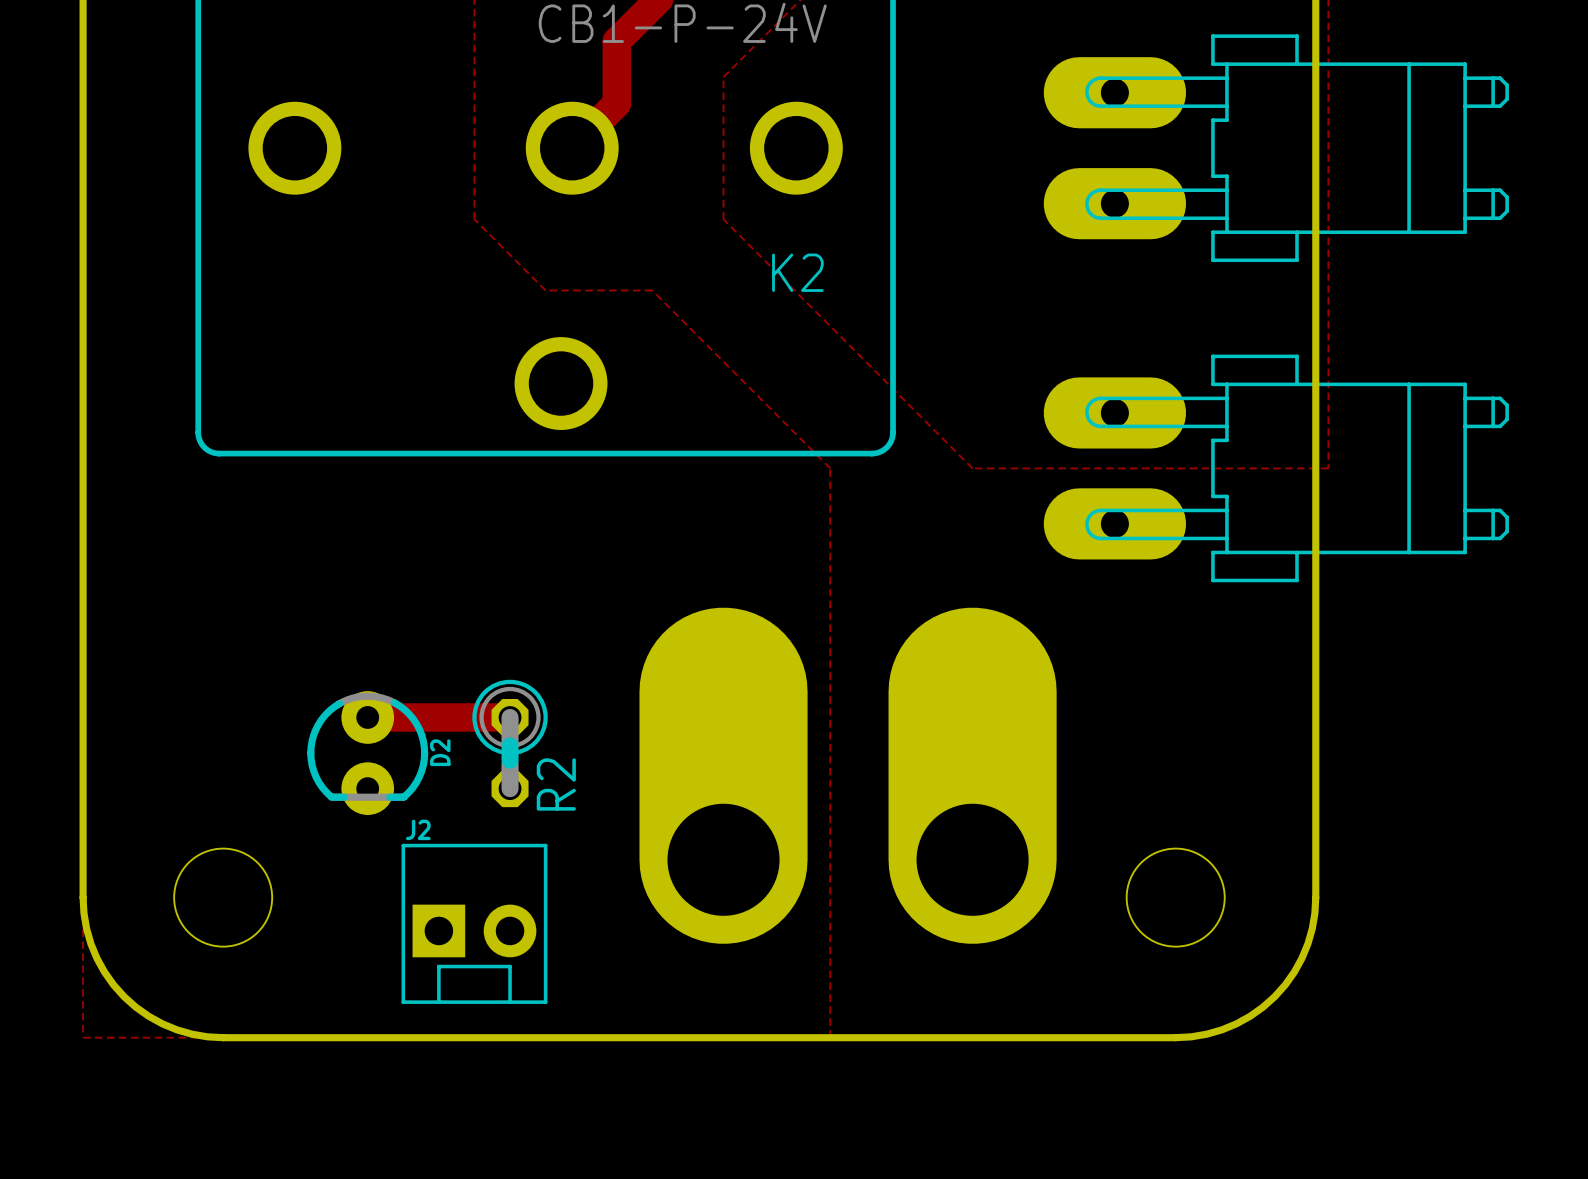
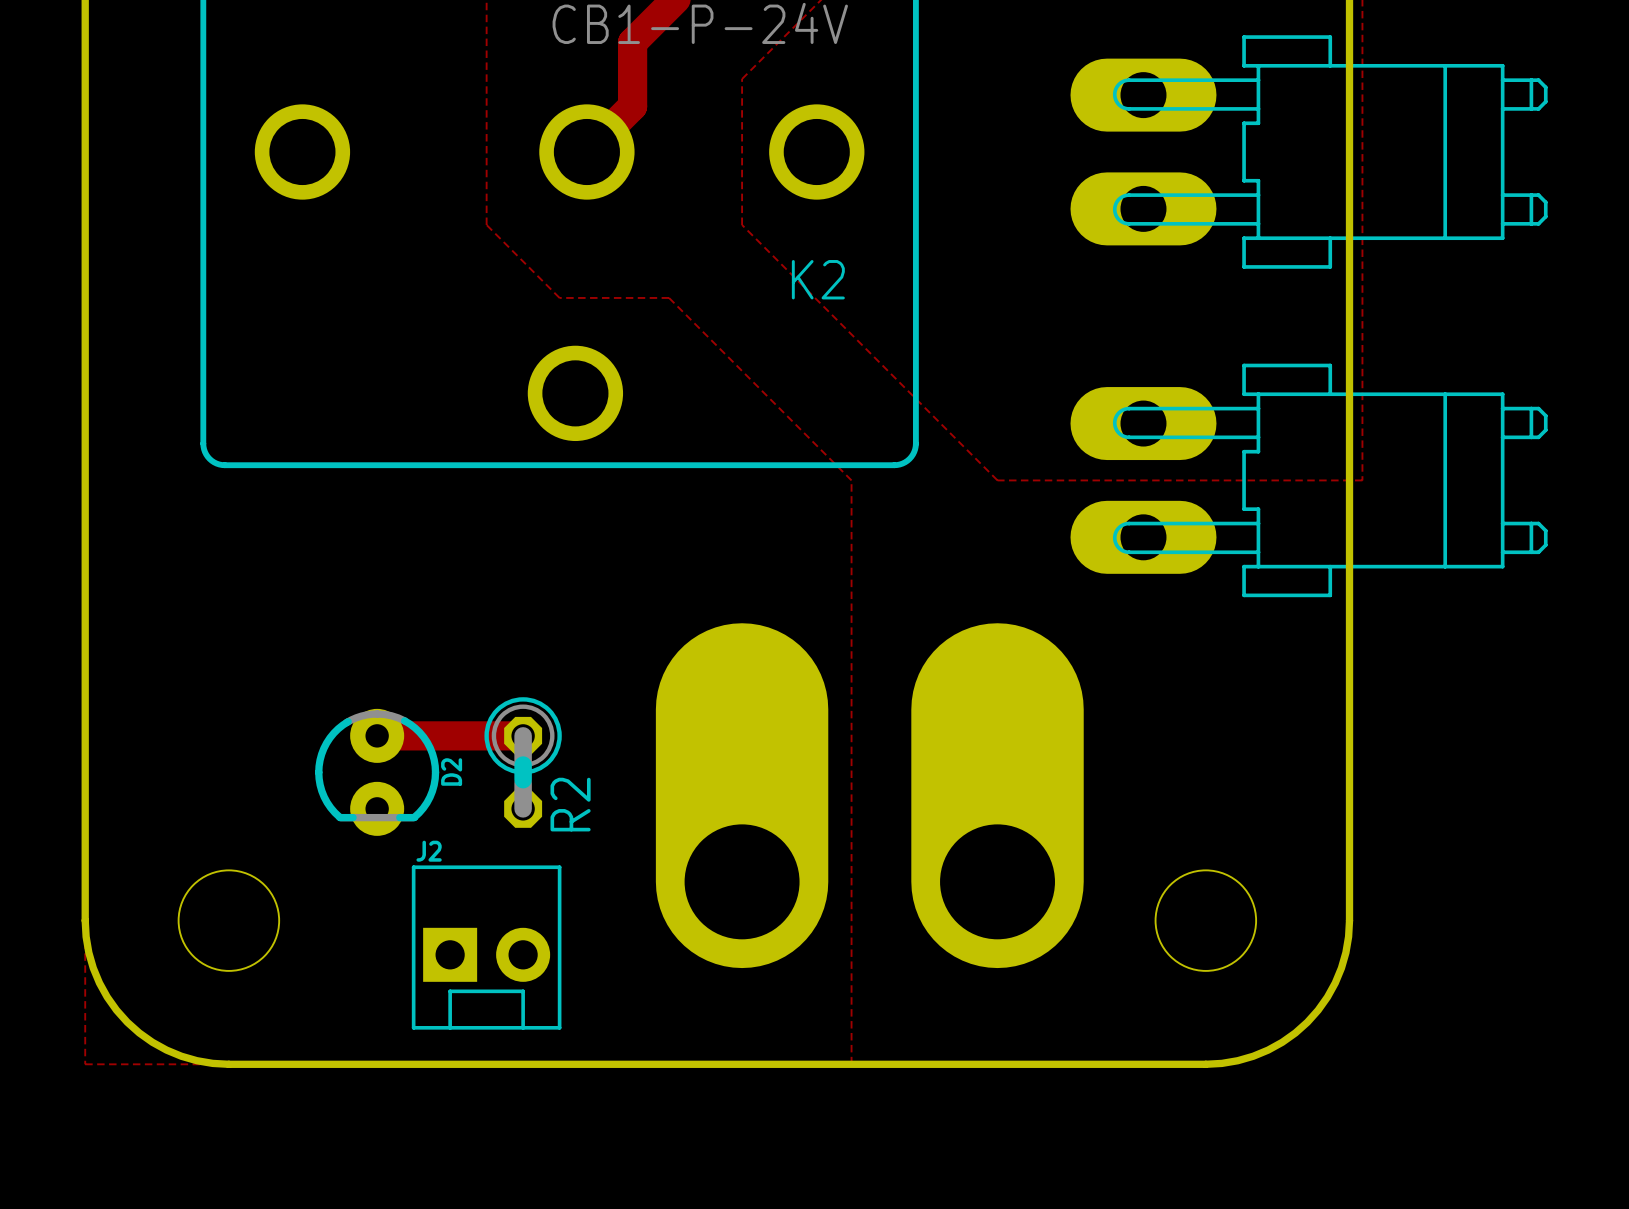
part footprint: [1043, 34, 1509, 263] -> [1070, 35, 1548, 269]
part footprint: [1043, 354, 1509, 583] -> [1070, 363, 1548, 598]

